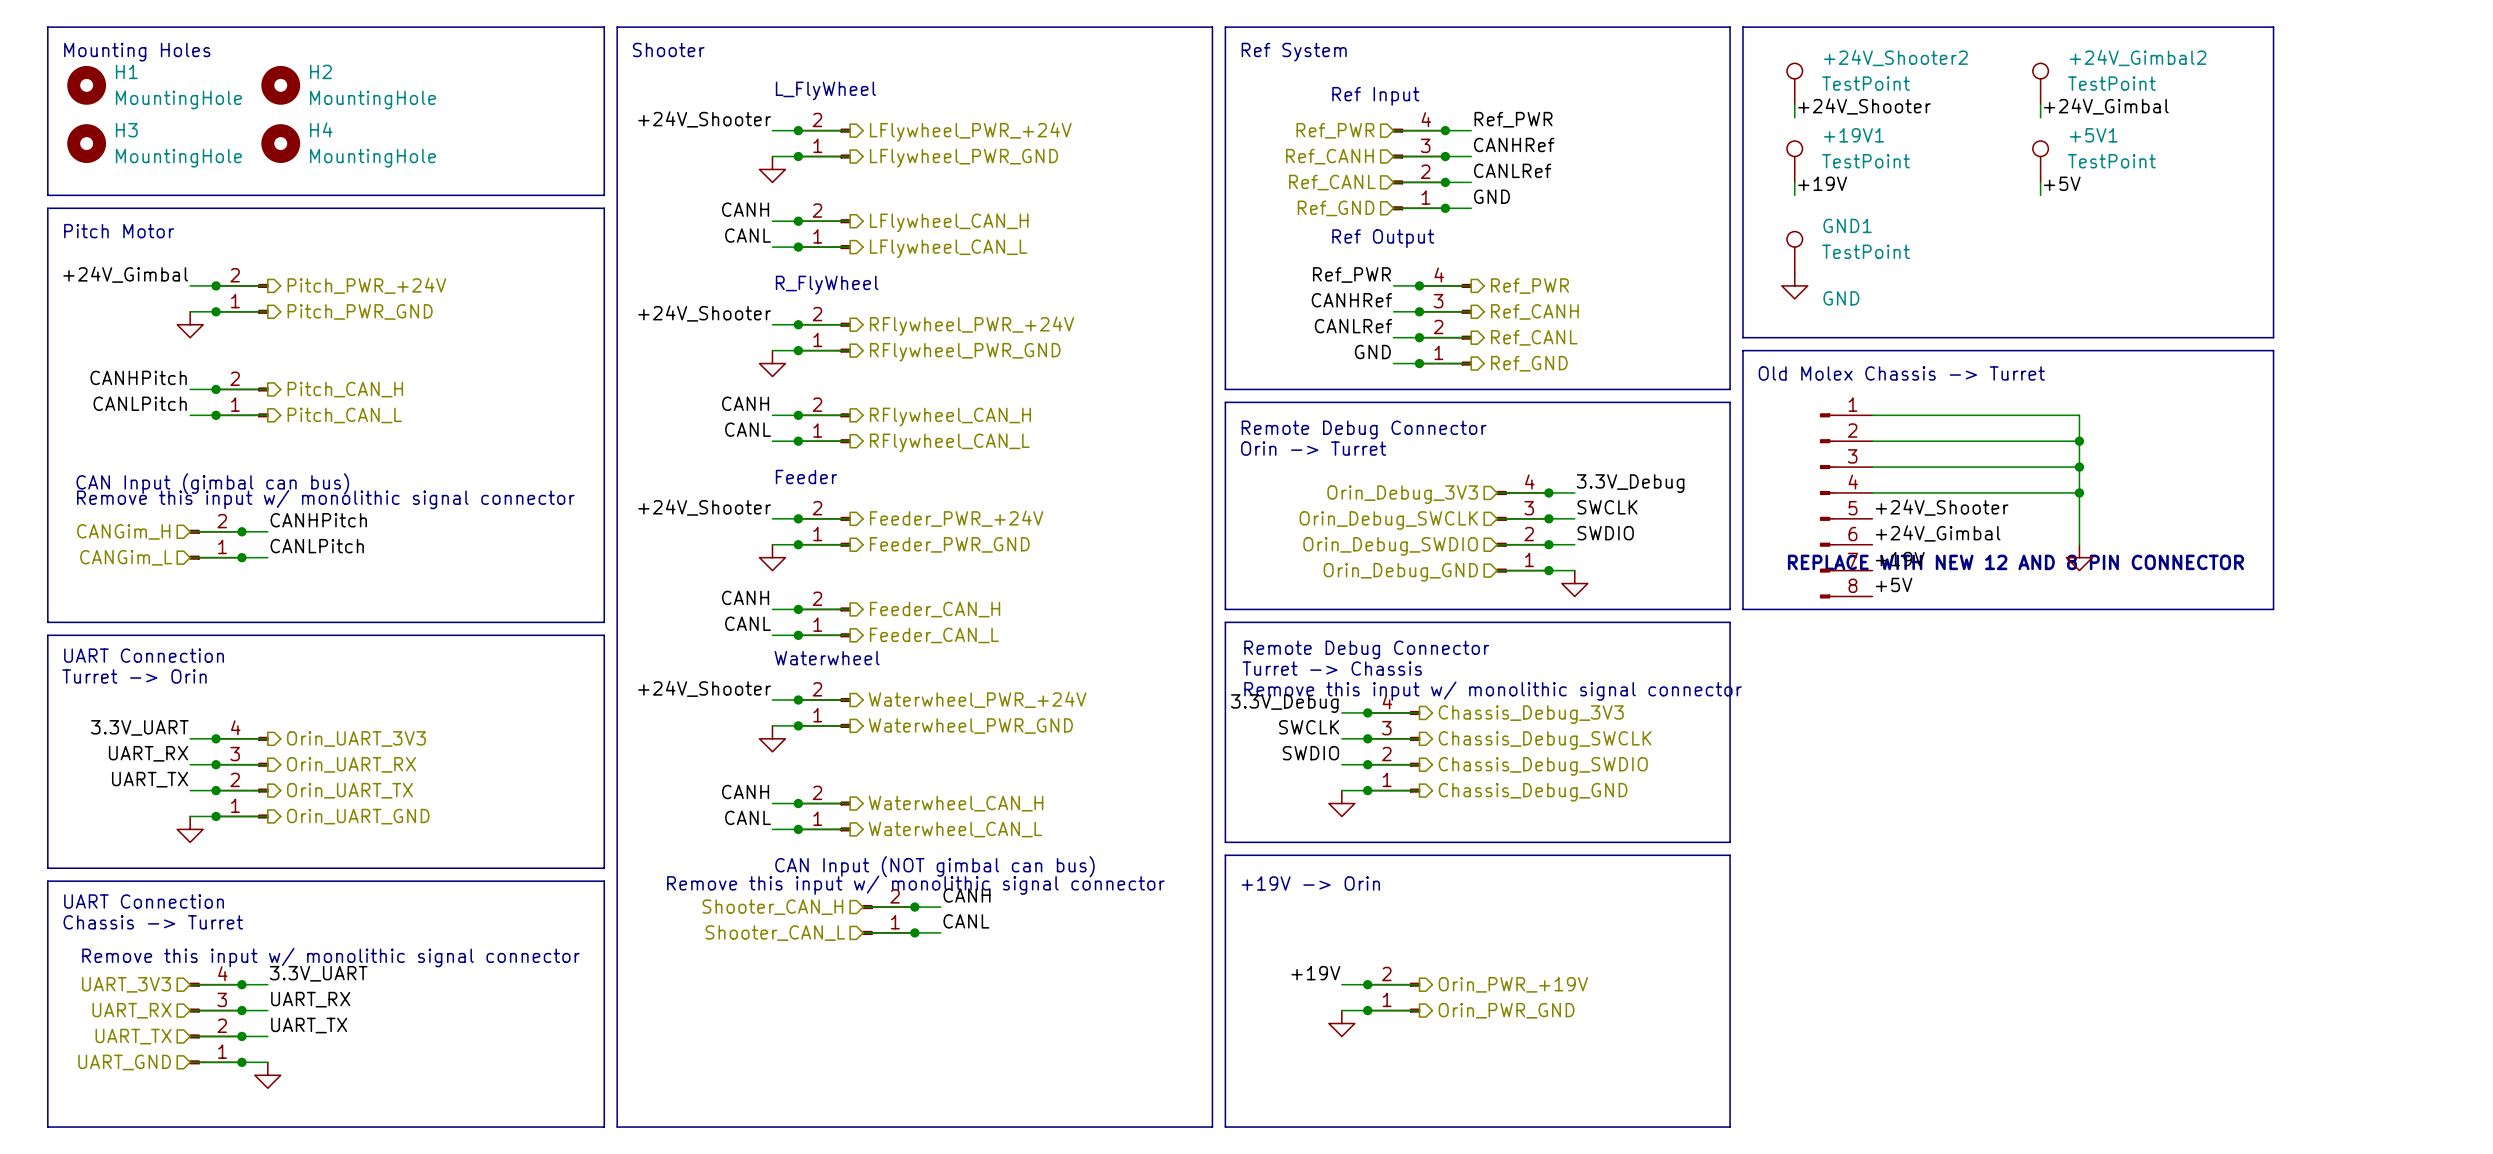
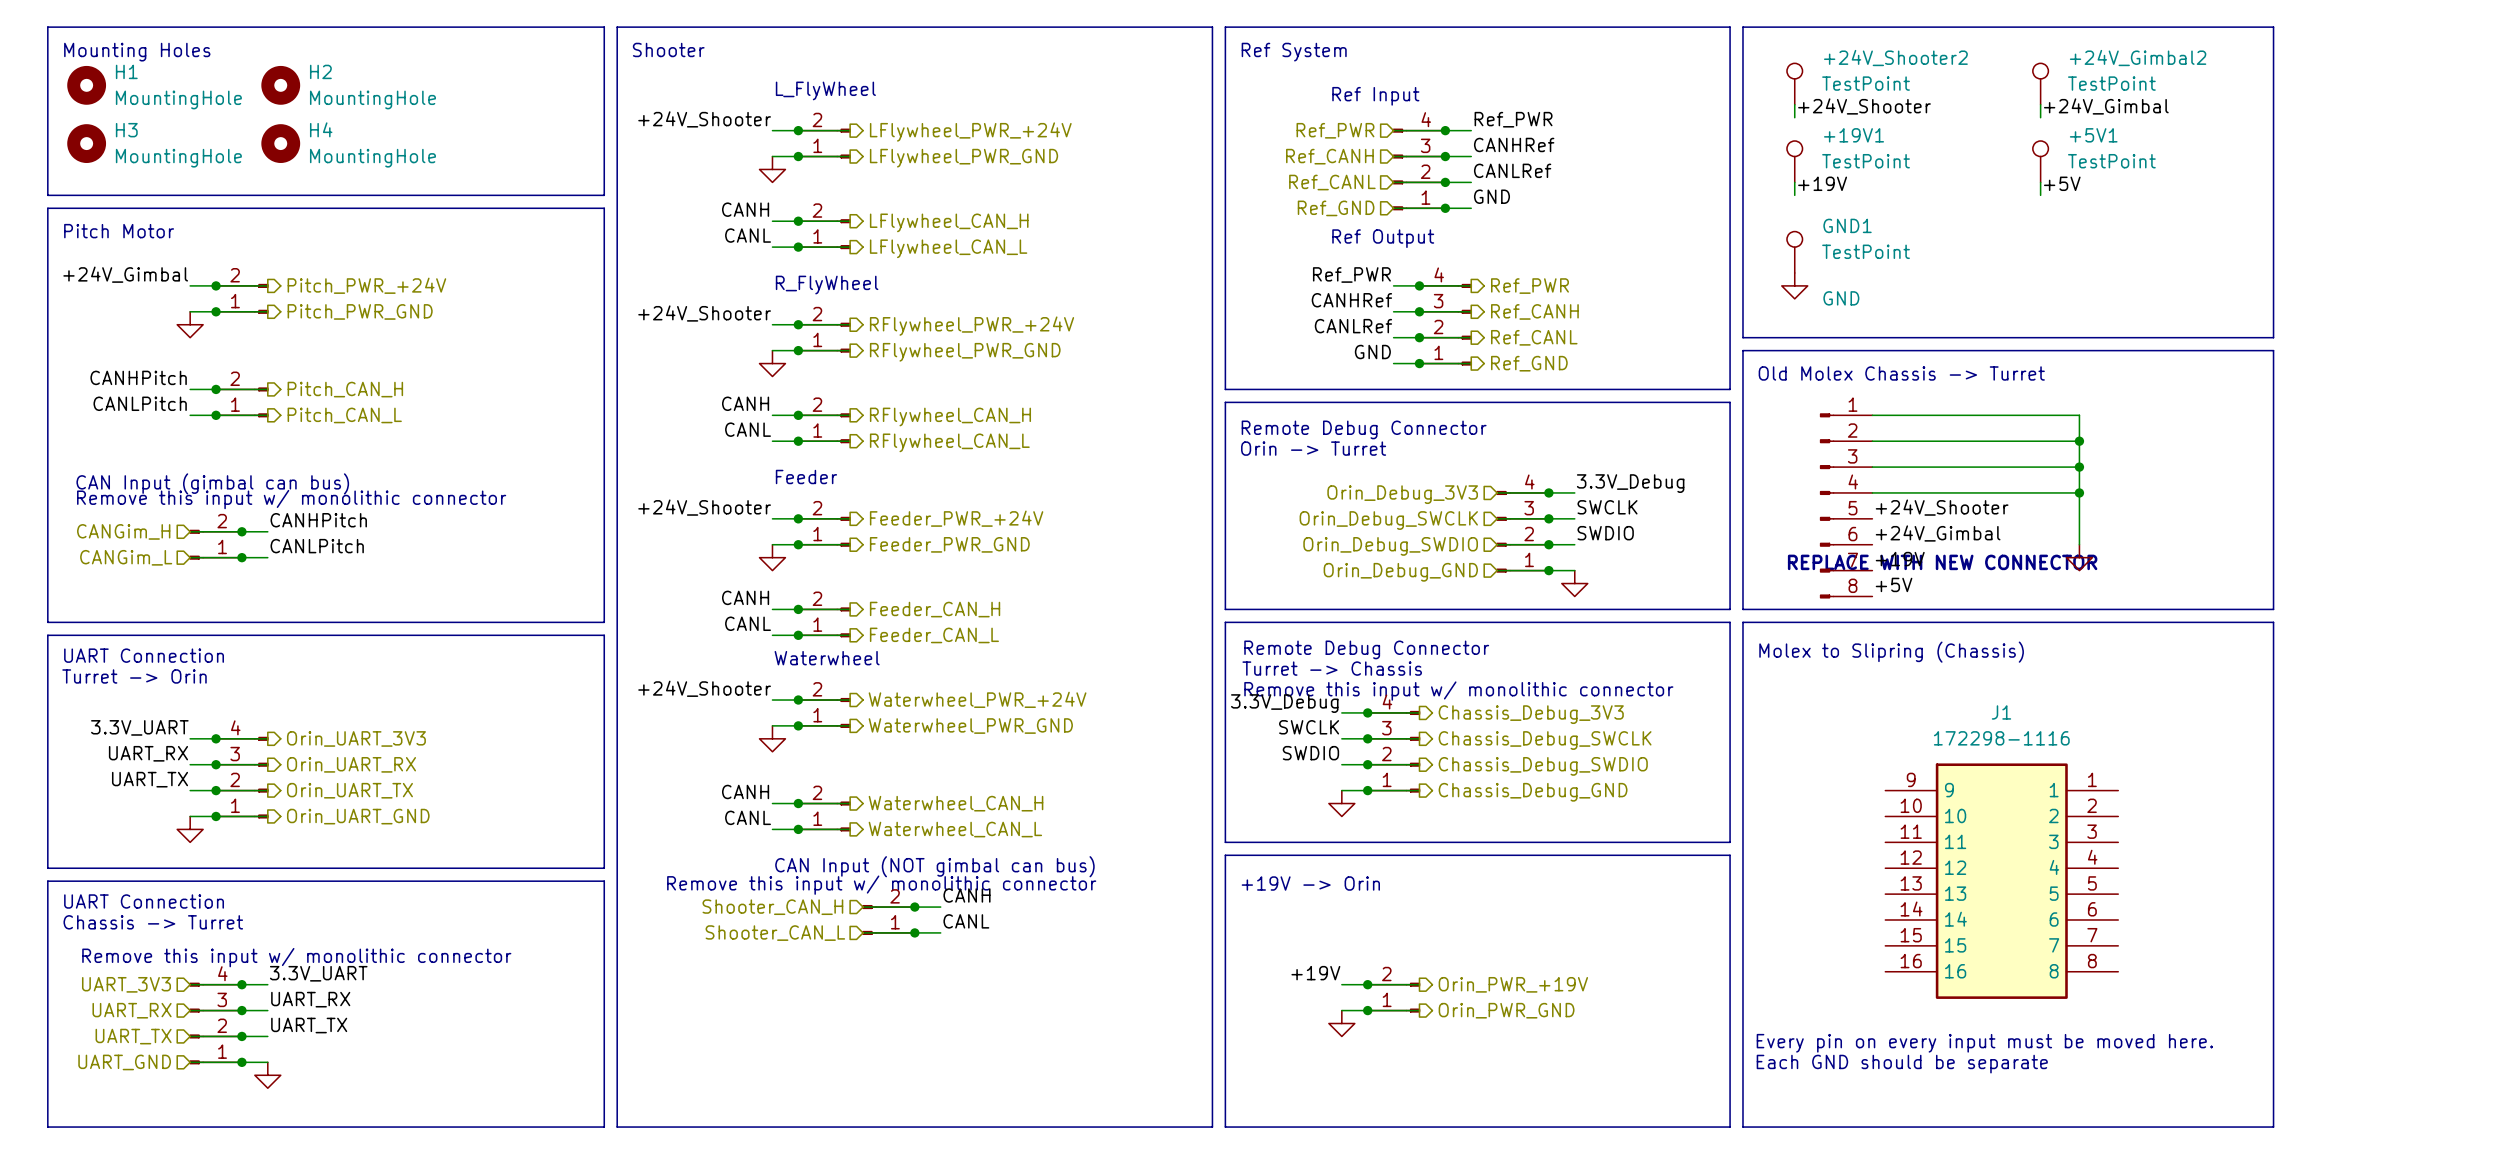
text: Remove this input w/ monolithic signal connector (325, 499) -> Remove this input w/ monolithic connector (291, 499)
text: REPLACE WITH NEW 12 AND 8 PIN CONNECTOR (2015, 562) -> REPLACE WITH NEW CONNECTOR (1942, 562)
line: none -> (1742, 622) (2273, 622) (2273, 1127) (1742, 1127) (1742, 622)
text: none -> Molex to Slipring (Chassis) (1891, 652)
text: Remove this input w/ monolithic signal connector (1493, 691) -> Remove this input w/ monolithic connector (1458, 691)
J1: none -> 172298-1116 (2001, 881)
text: Remove this input w/ monolithic signal connector (915, 885) -> Remove this input w/ monolithic connector (881, 885)
text: Remove this input w/ monolithic signal connector (331, 957) -> Remove this input w/ monolithic connector (296, 957)
text: none -> Every pin on every input must be moved here. (1984, 1043)
text: none -> Each GND should be separate (1902, 1064)

